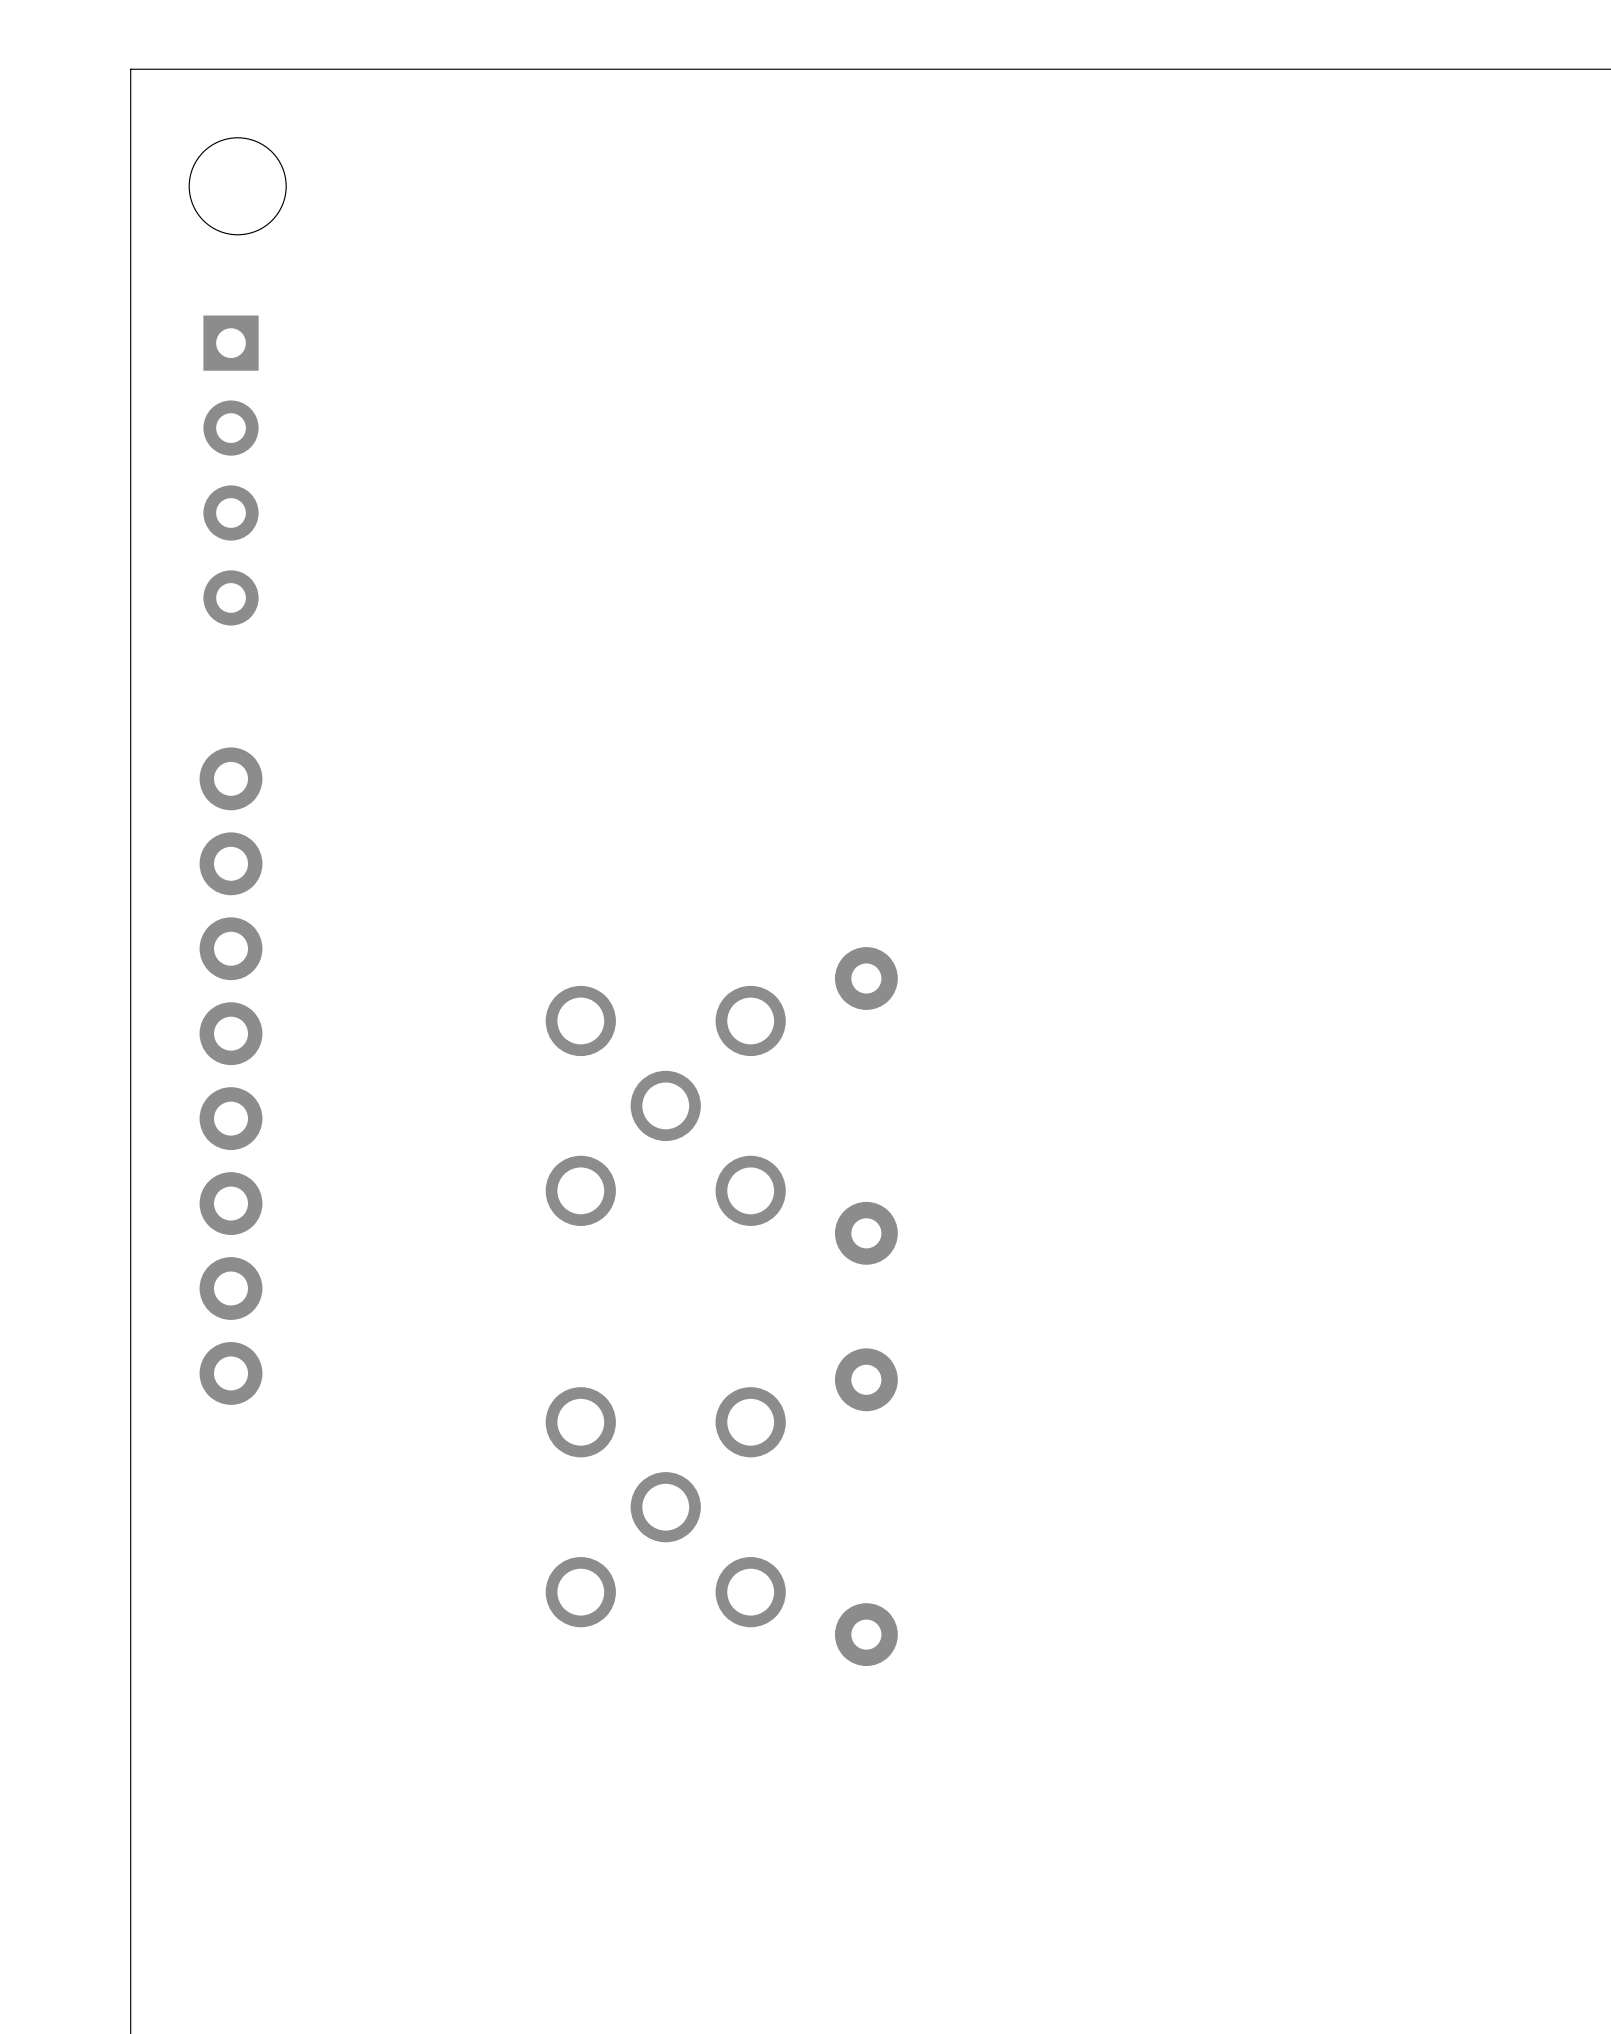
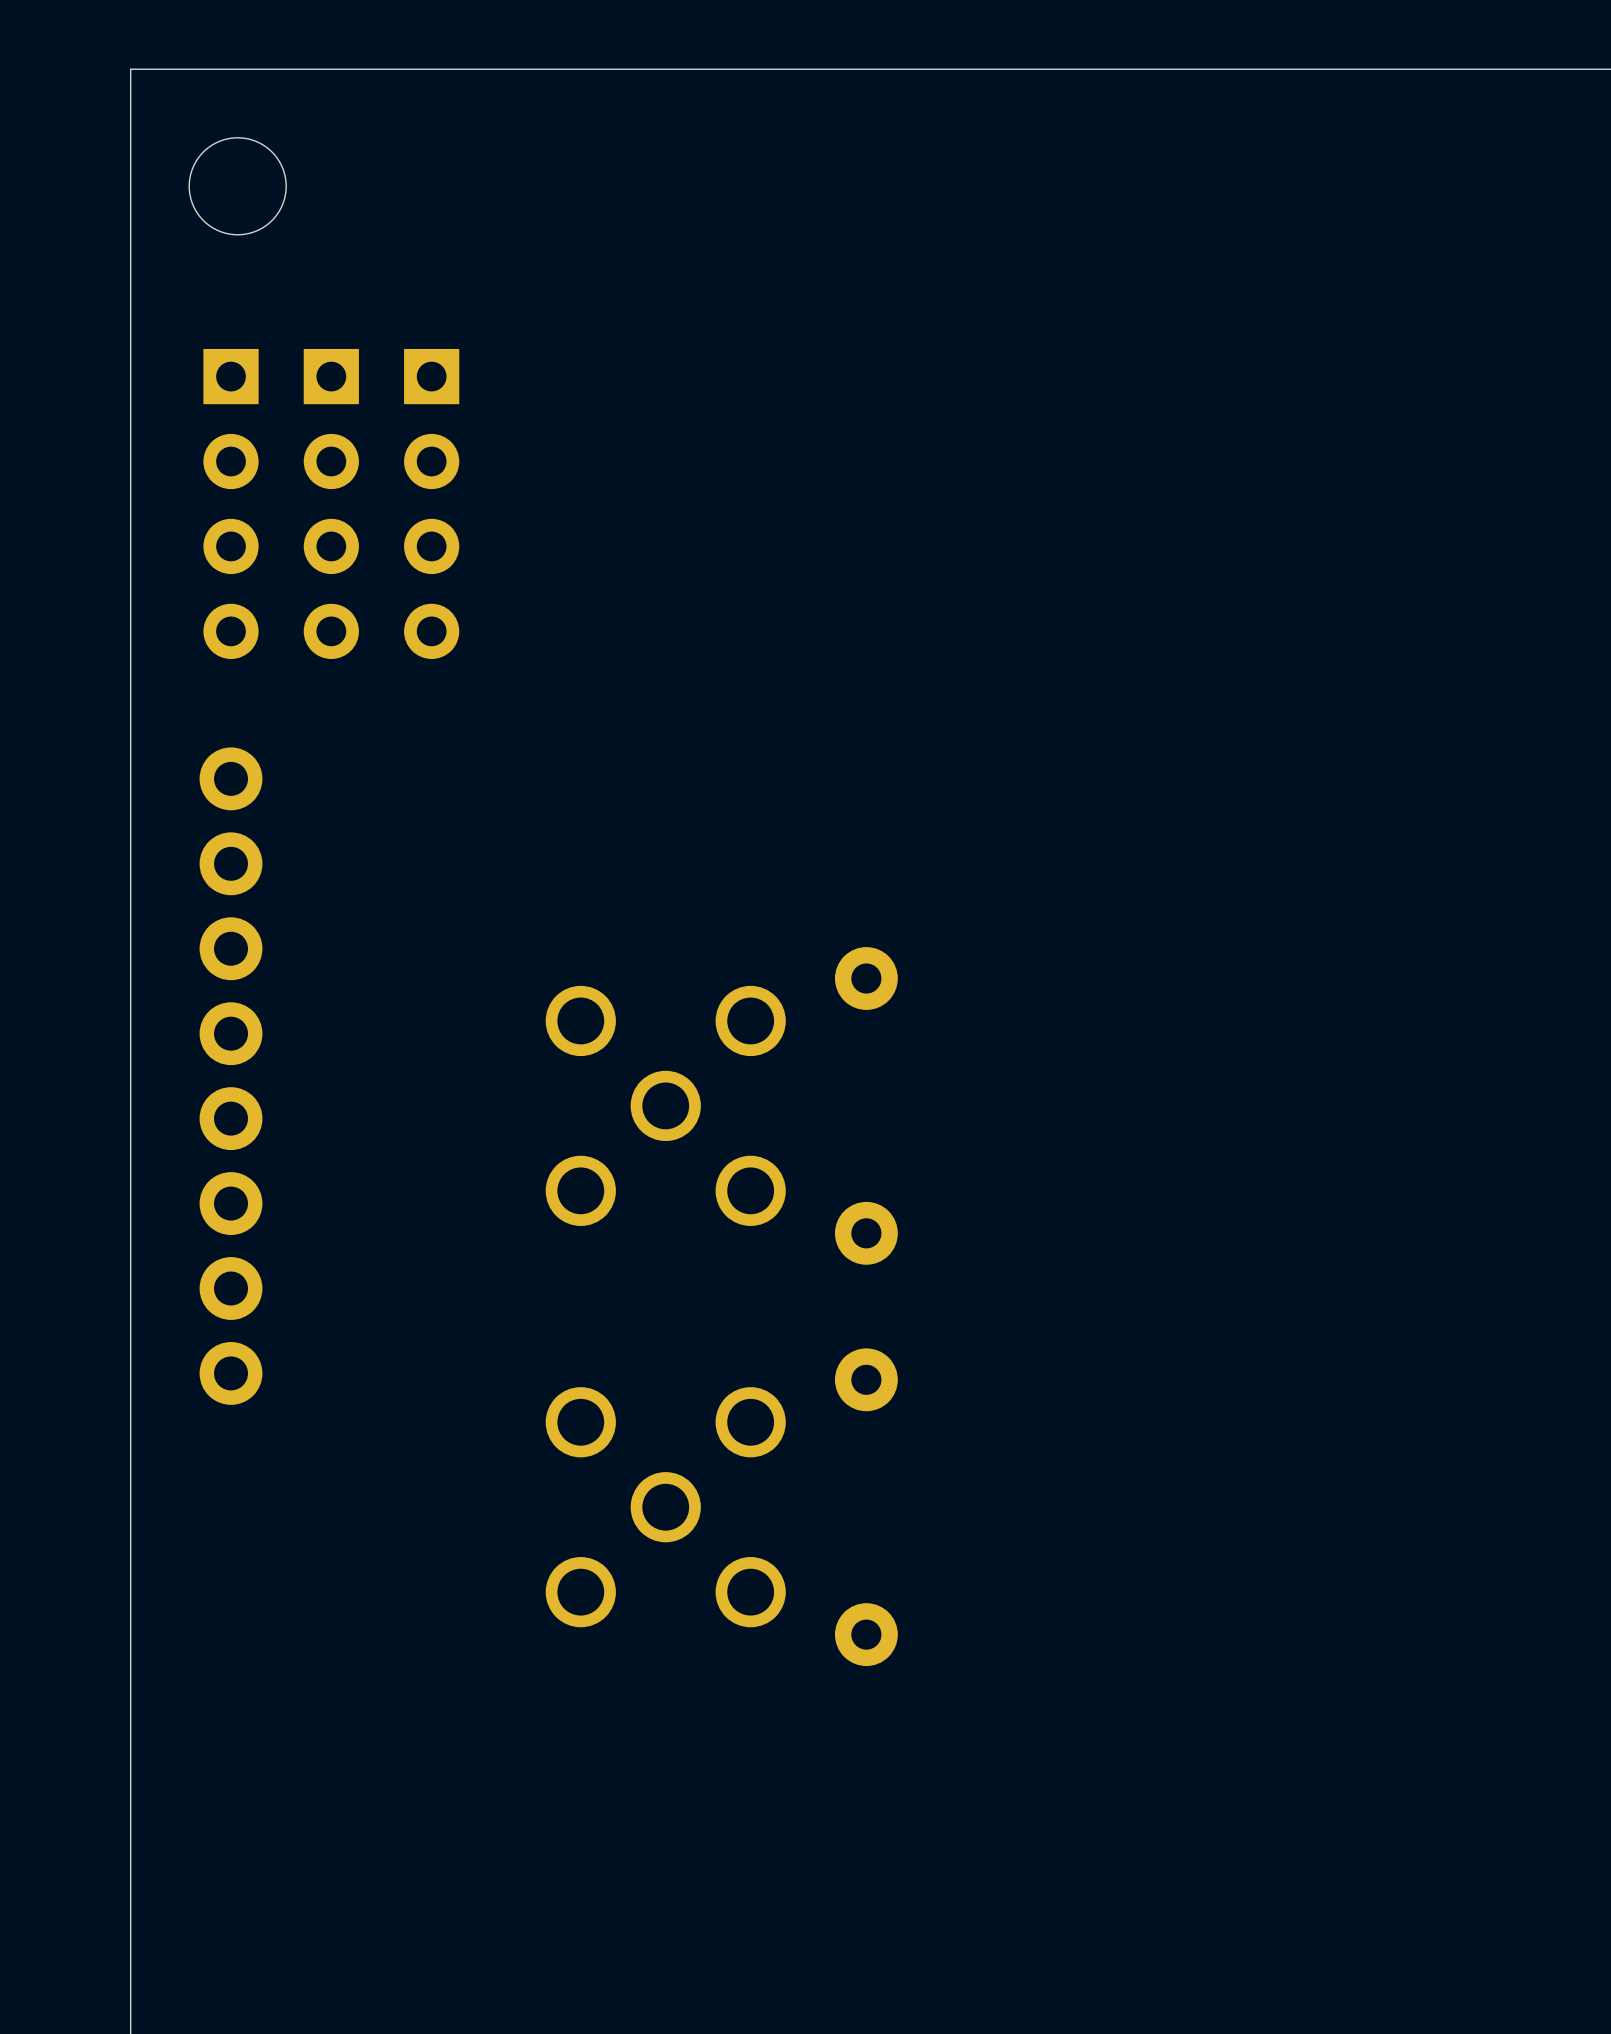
part position: (231, 470) -> (231, 503)
part: none -> (331, 503)
part: none -> (431, 503)

